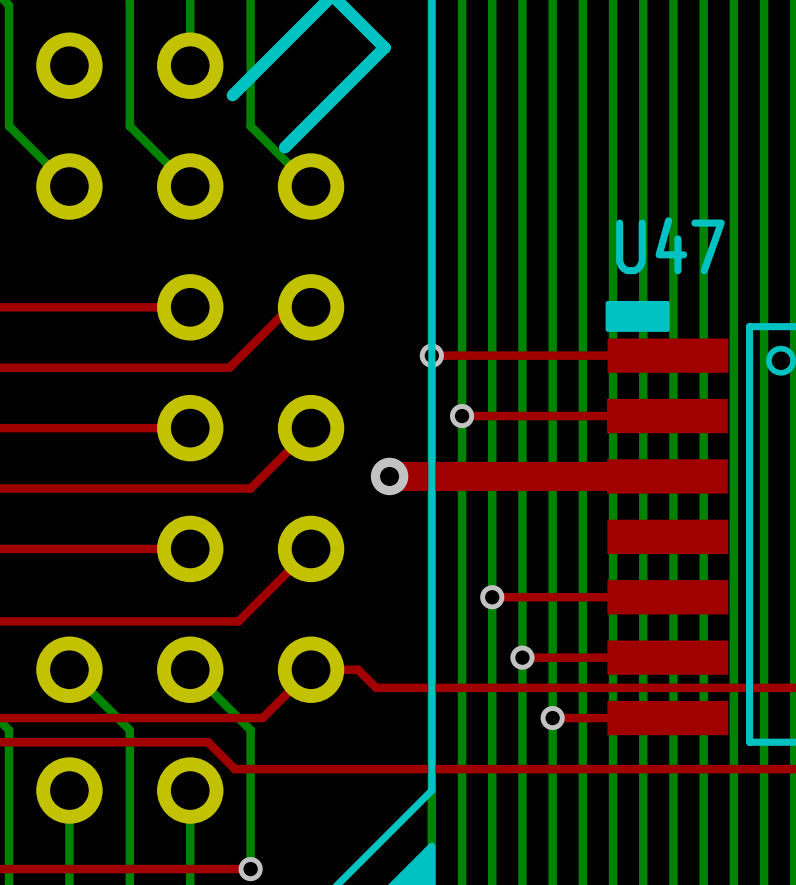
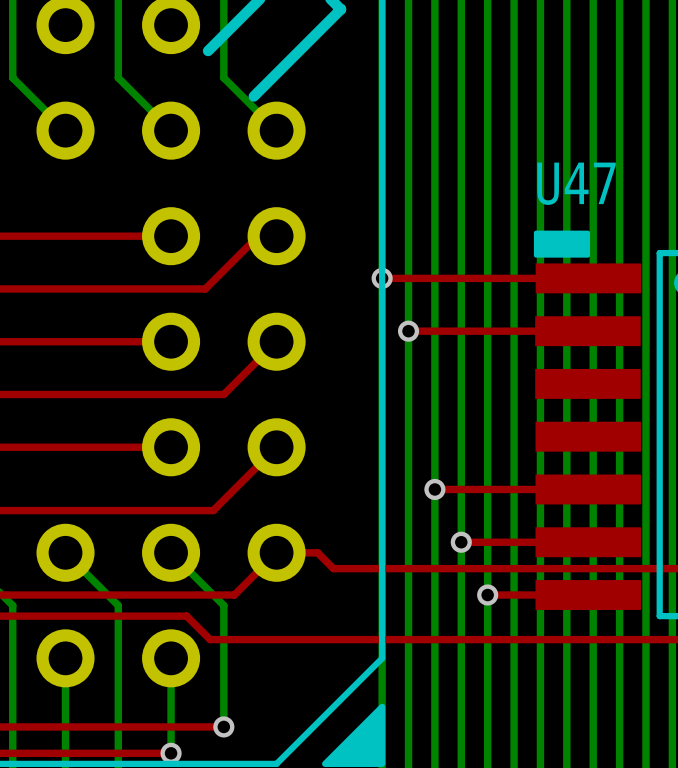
top track: (389, 476) (667, 476) -> none
via: (389, 476) -> none

